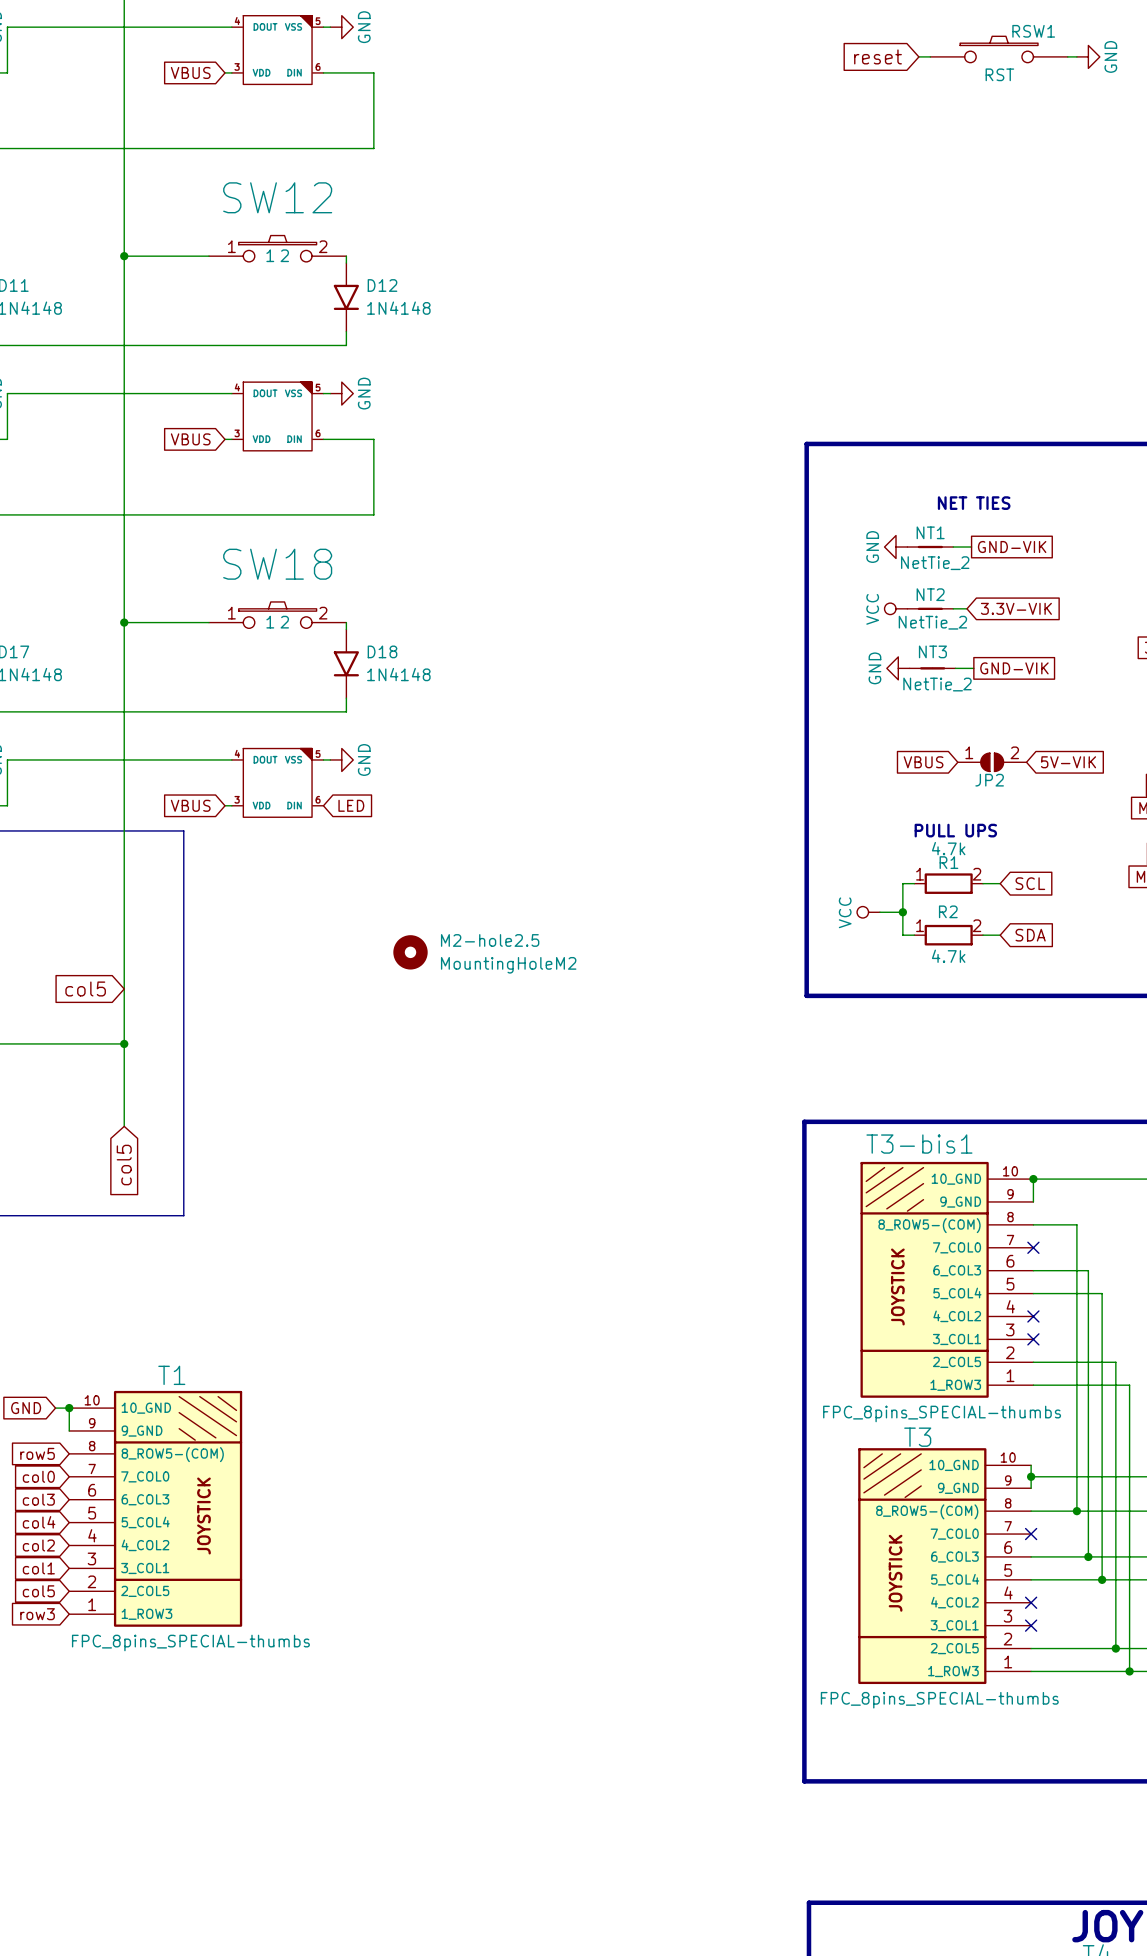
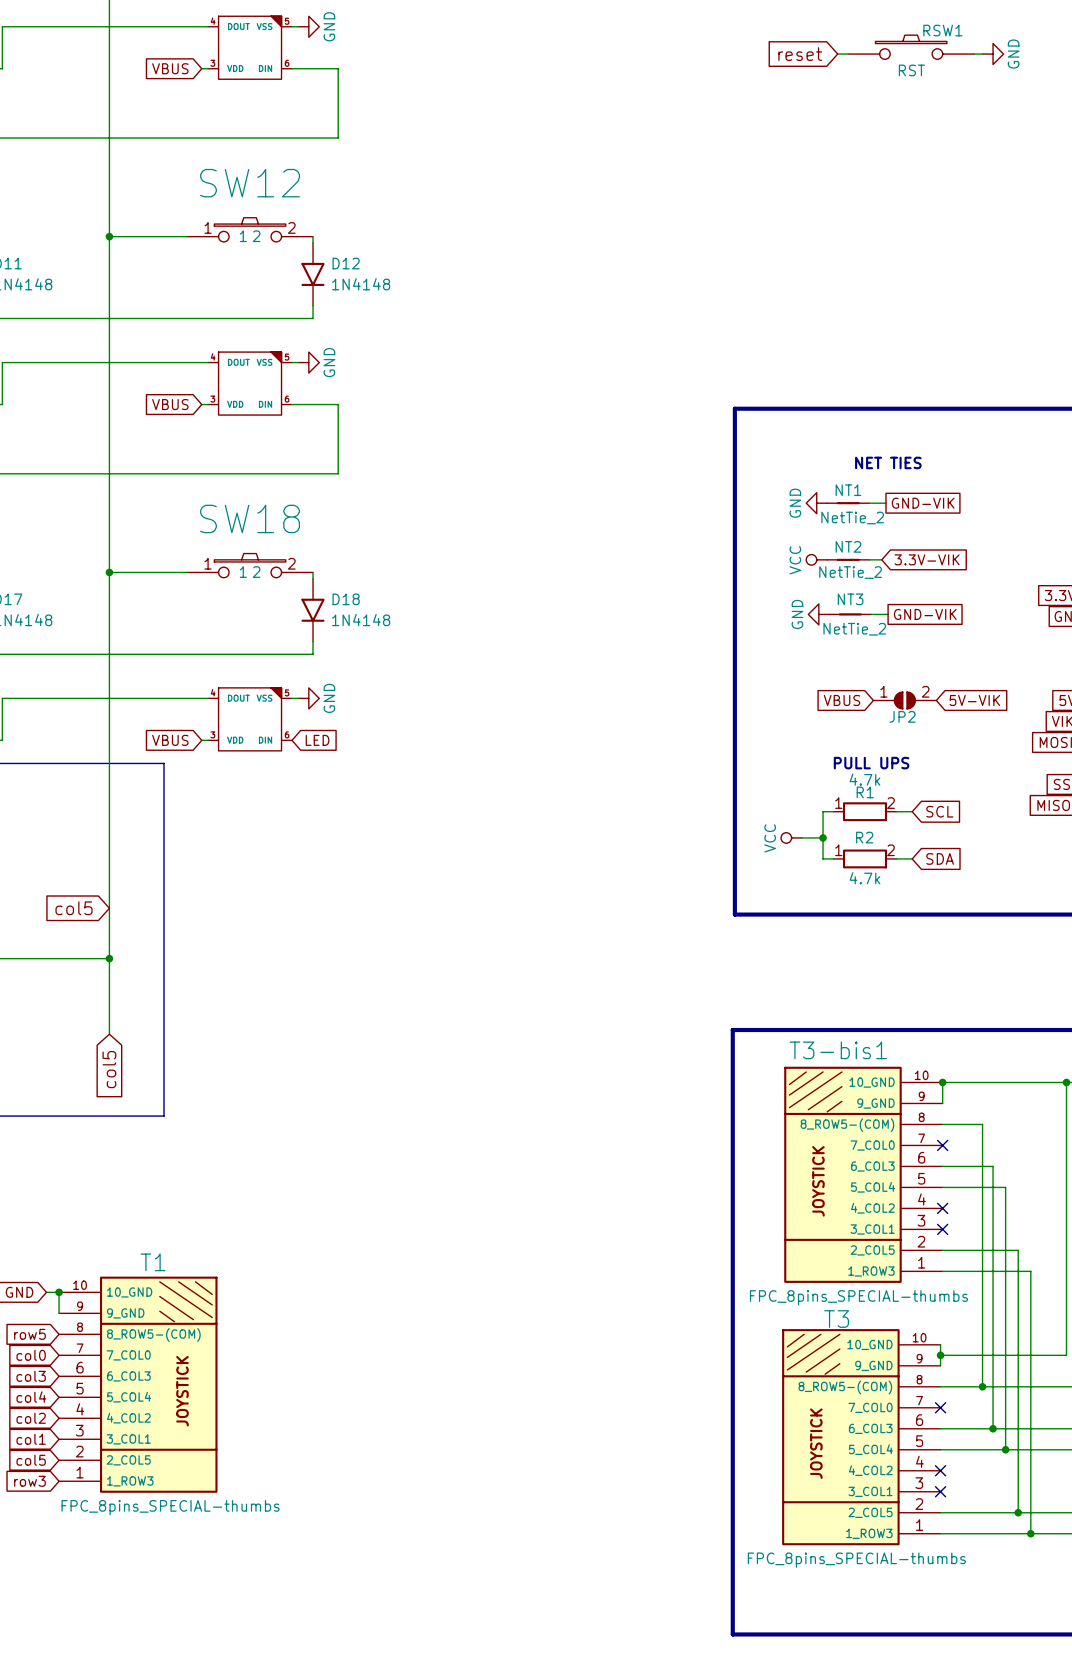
M2-hole2.5: MountingHoleM2 (410, 952) -> none

